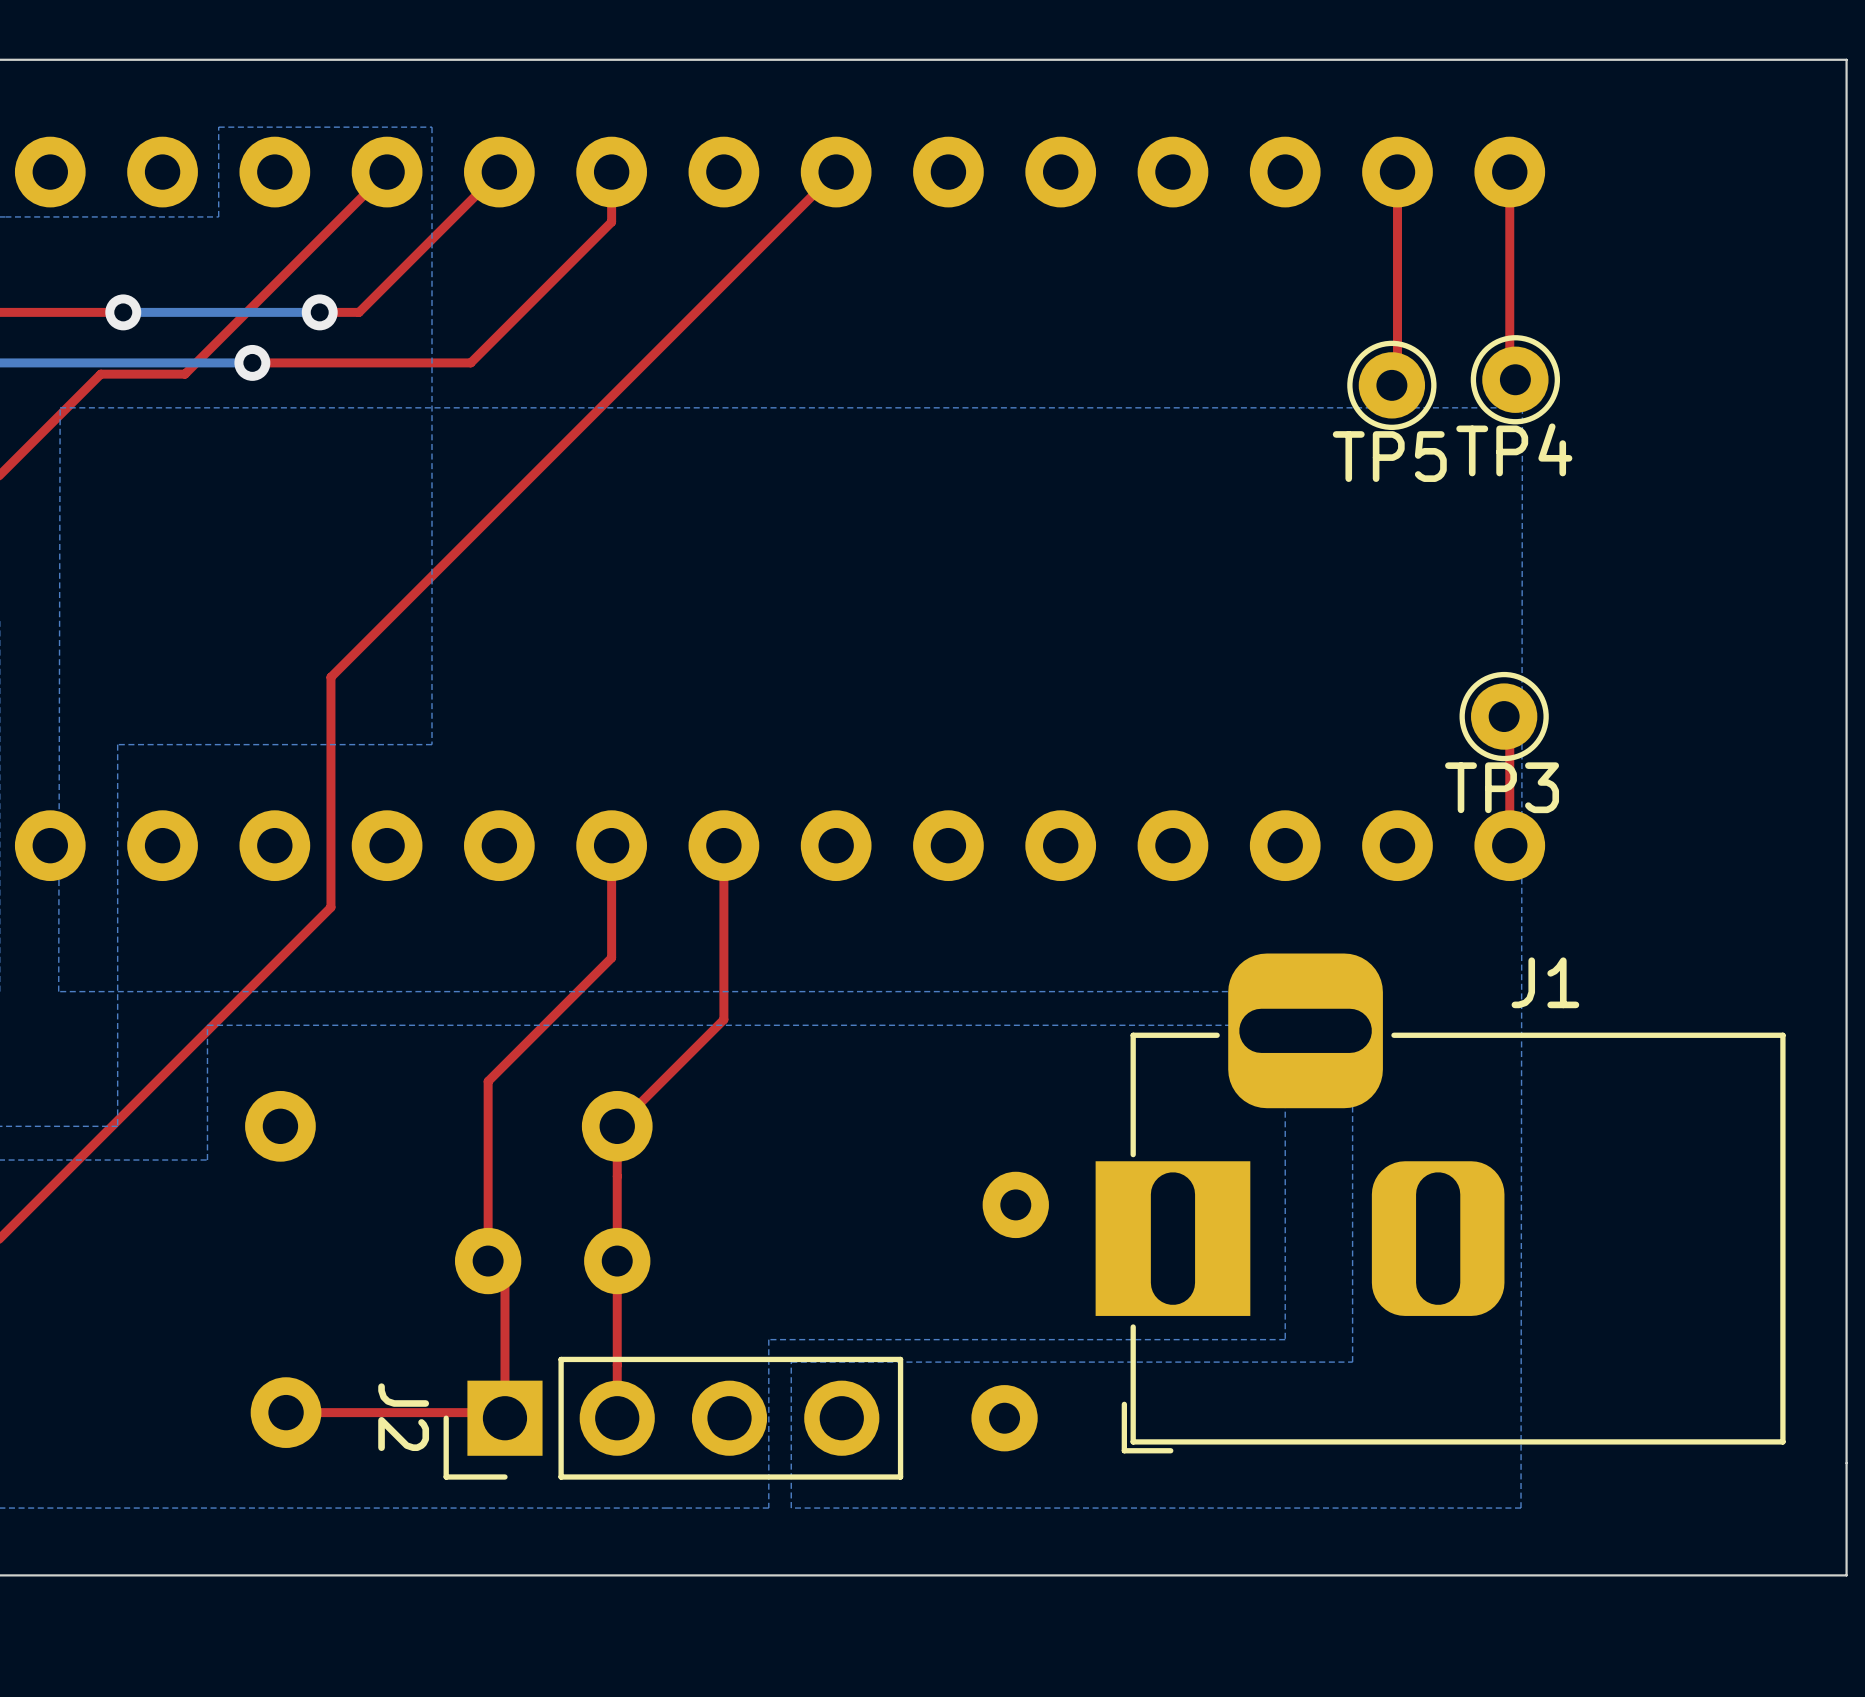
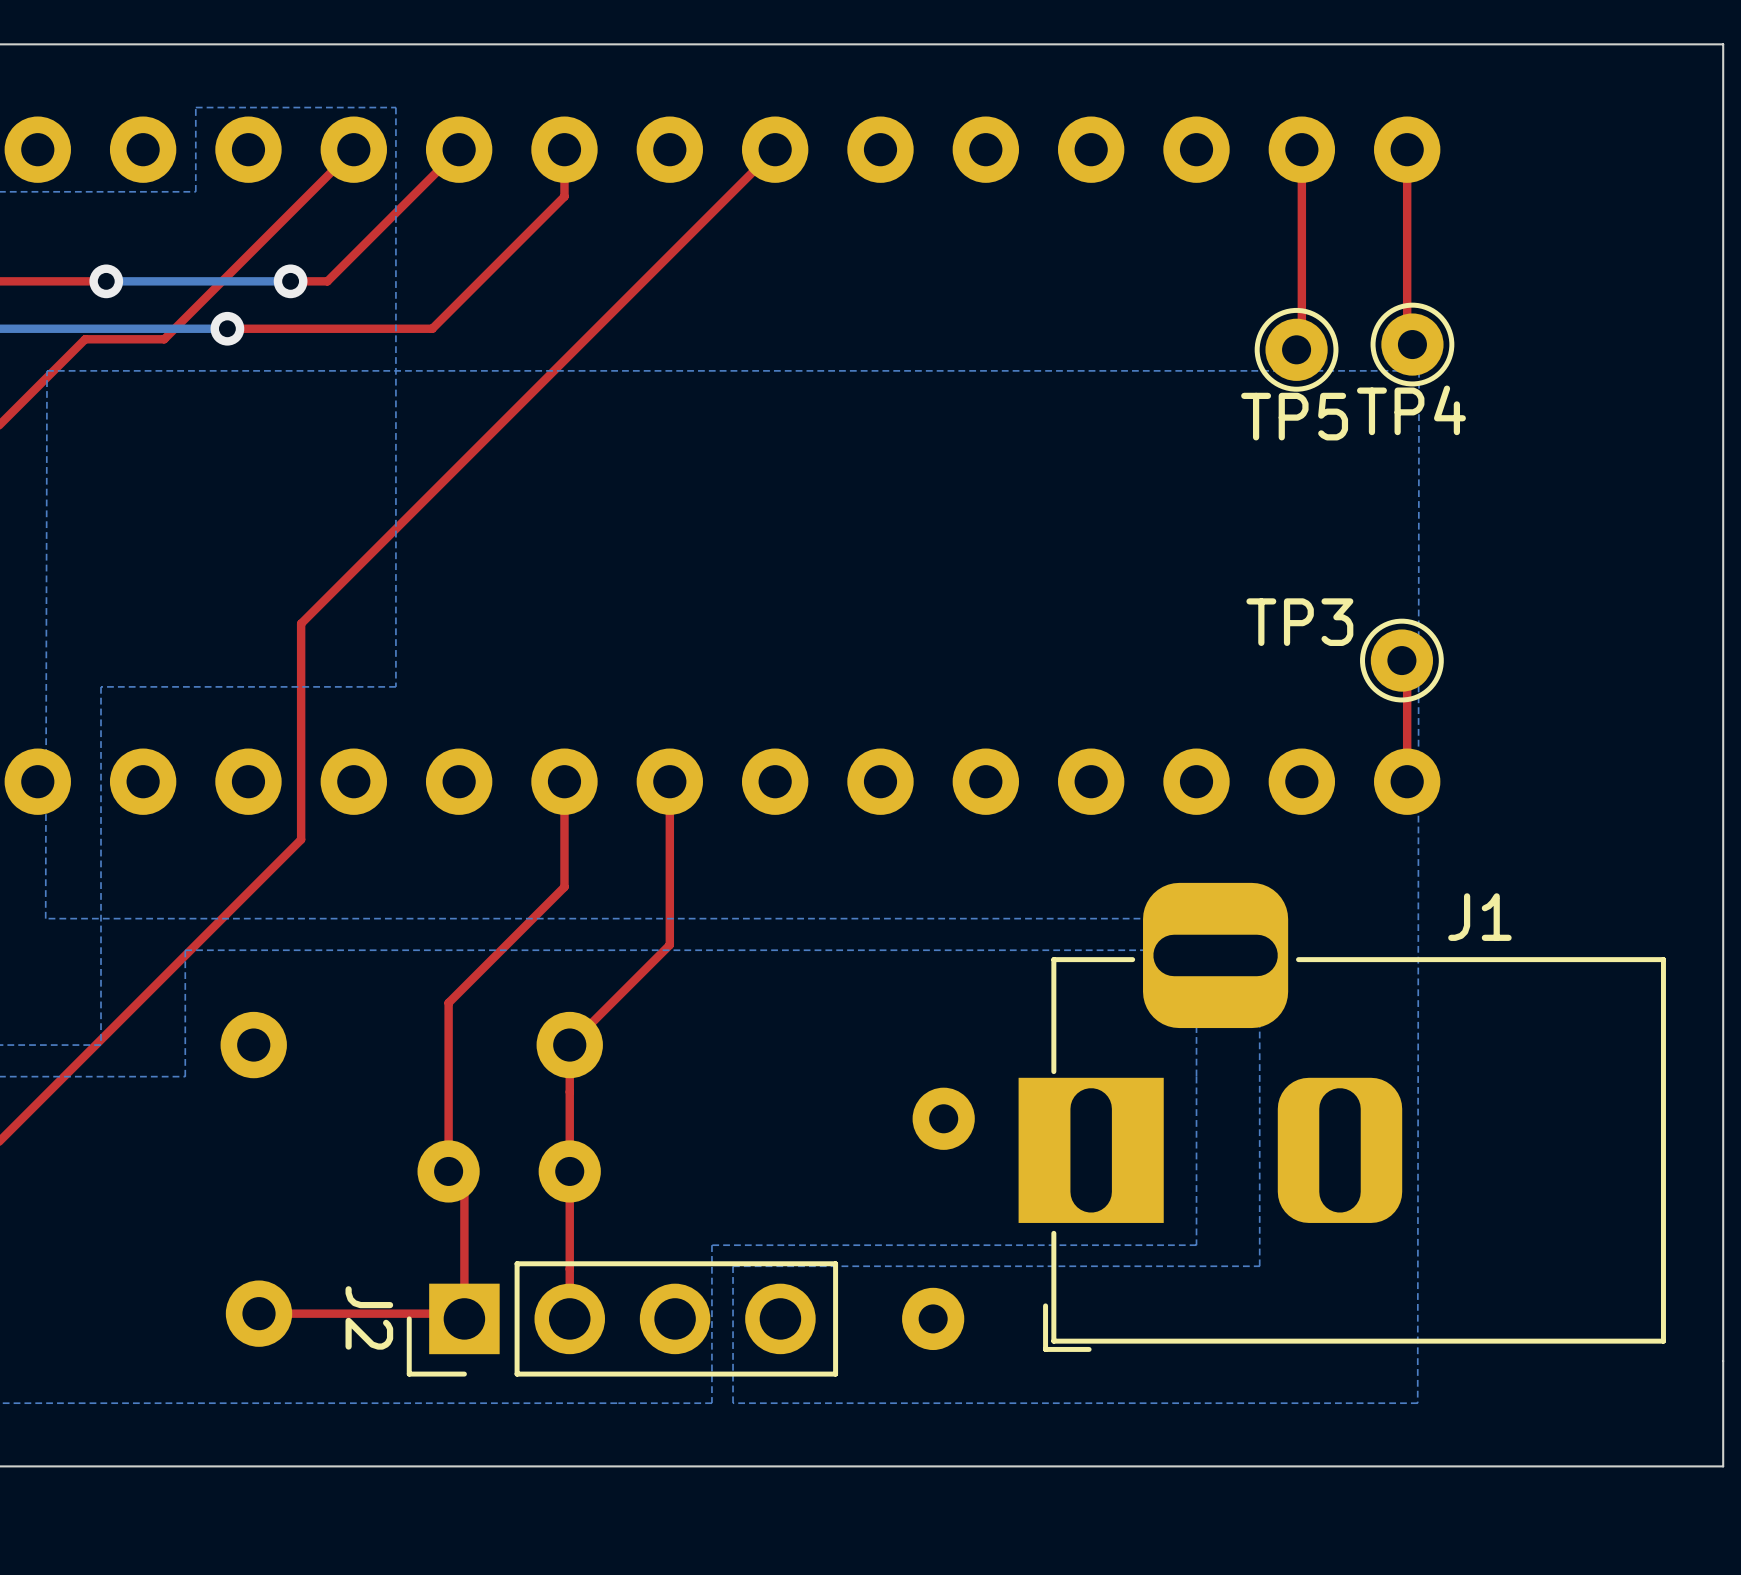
TP3 name position: TP3 (1502, 787) -> TP3 (1299, 622)
J1 name position: J1 (1545, 982) -> J1 (1479, 917)

